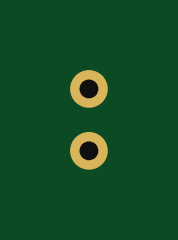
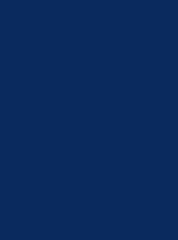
part: (88, 119) -> none

